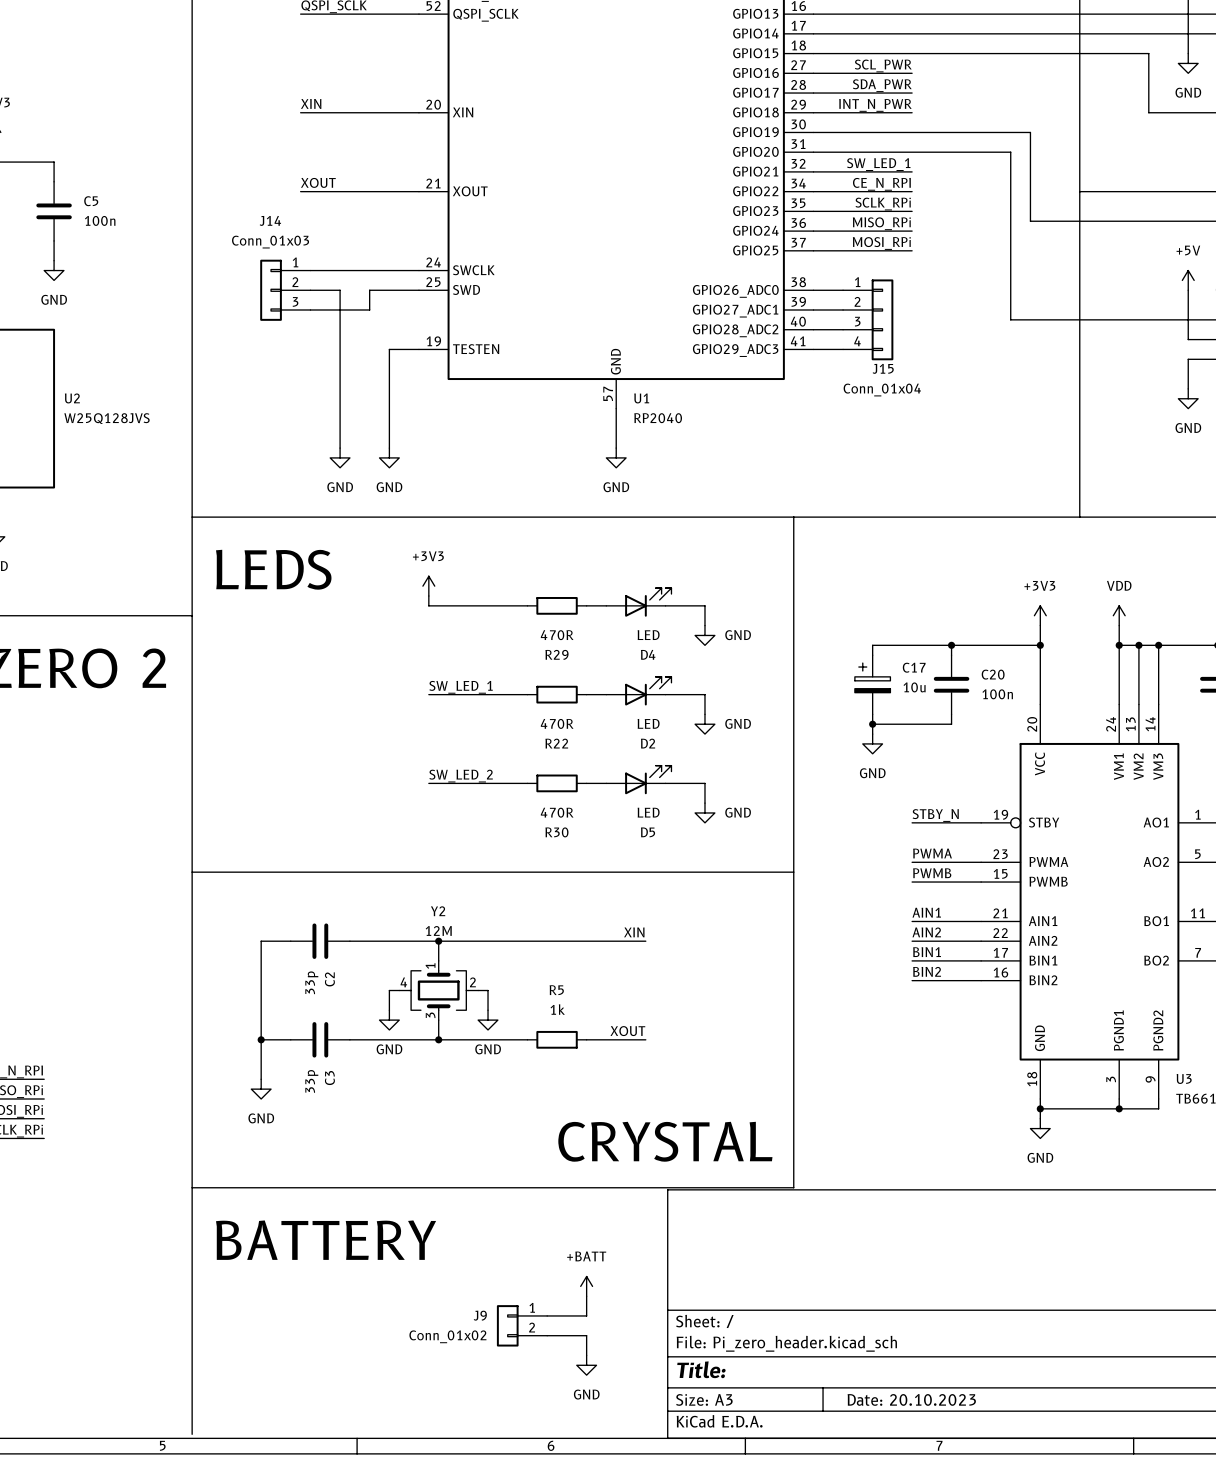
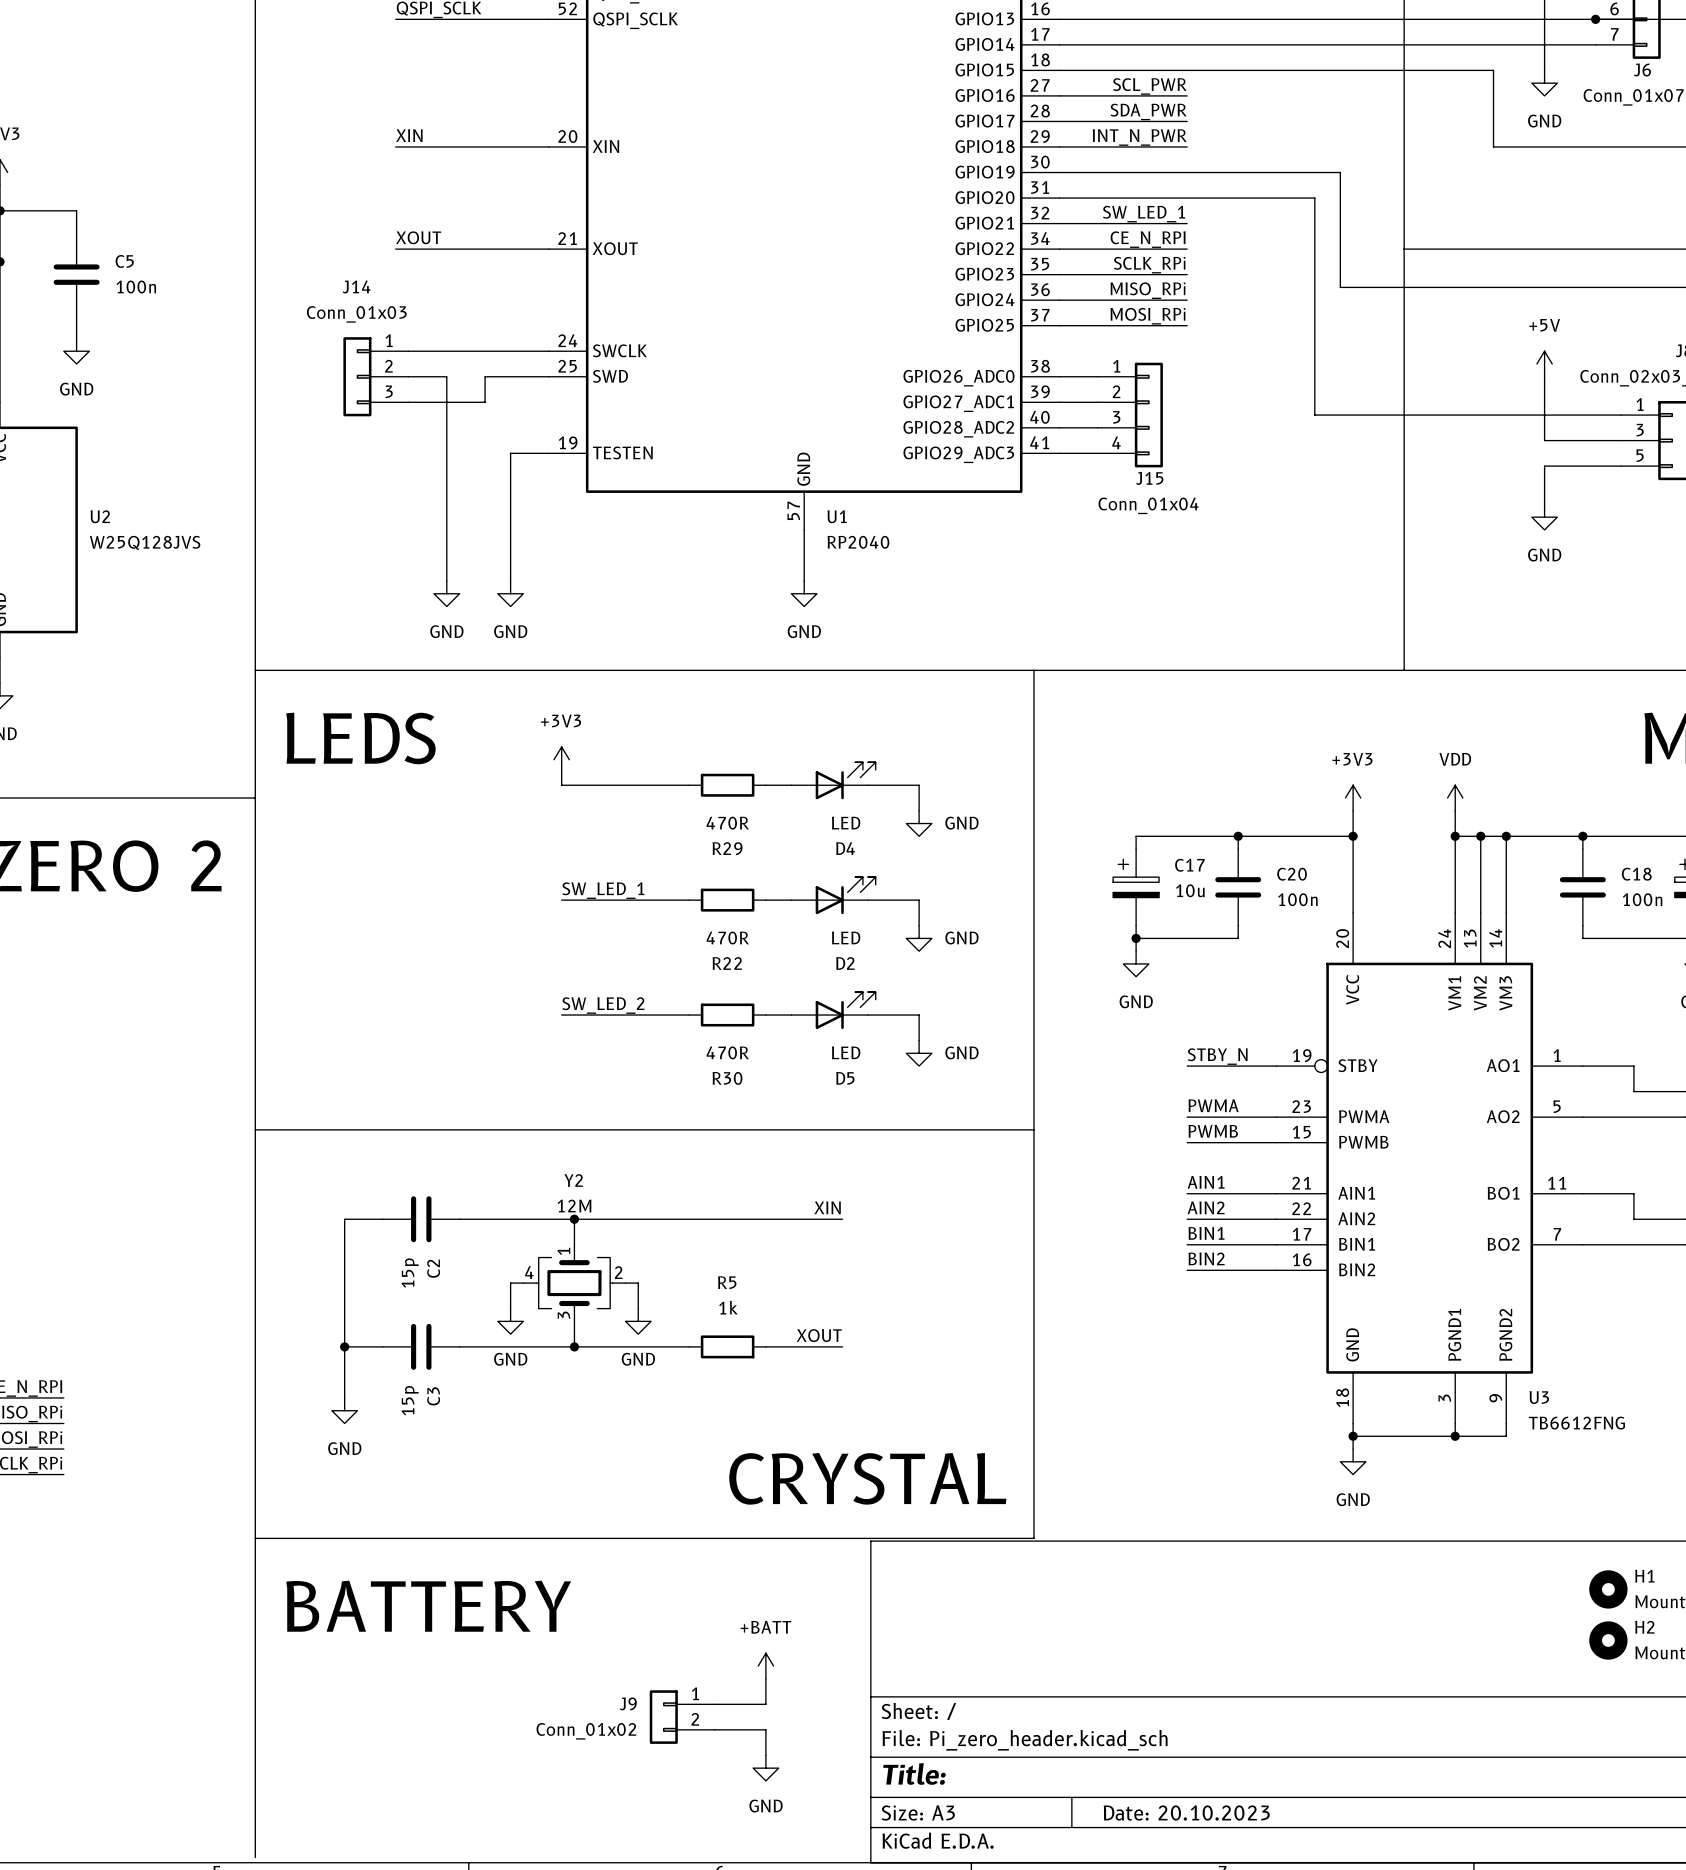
C2 value: 33p (311, 982) -> 15p (410, 1273)
C3 value: 33p (311, 1081) -> 15p (410, 1400)

